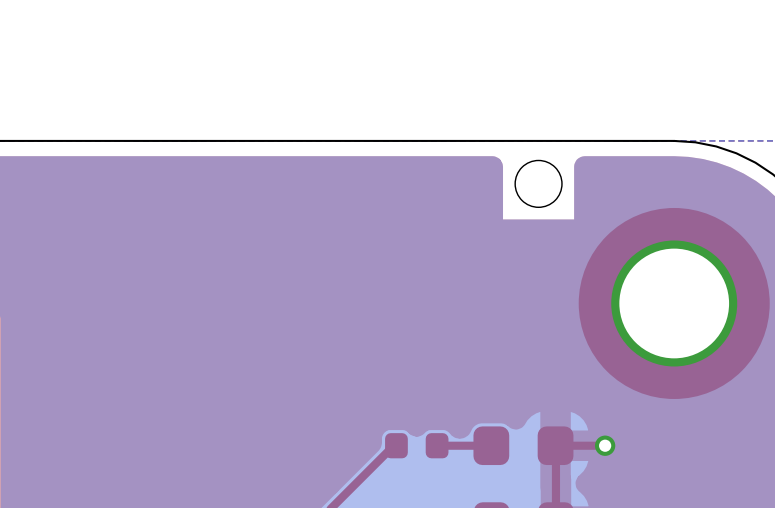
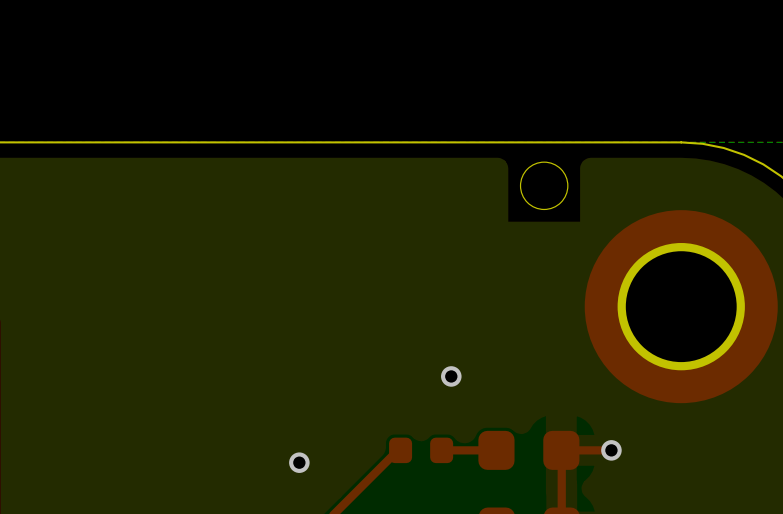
via: none -> (451, 376)
via: none -> (299, 462)

